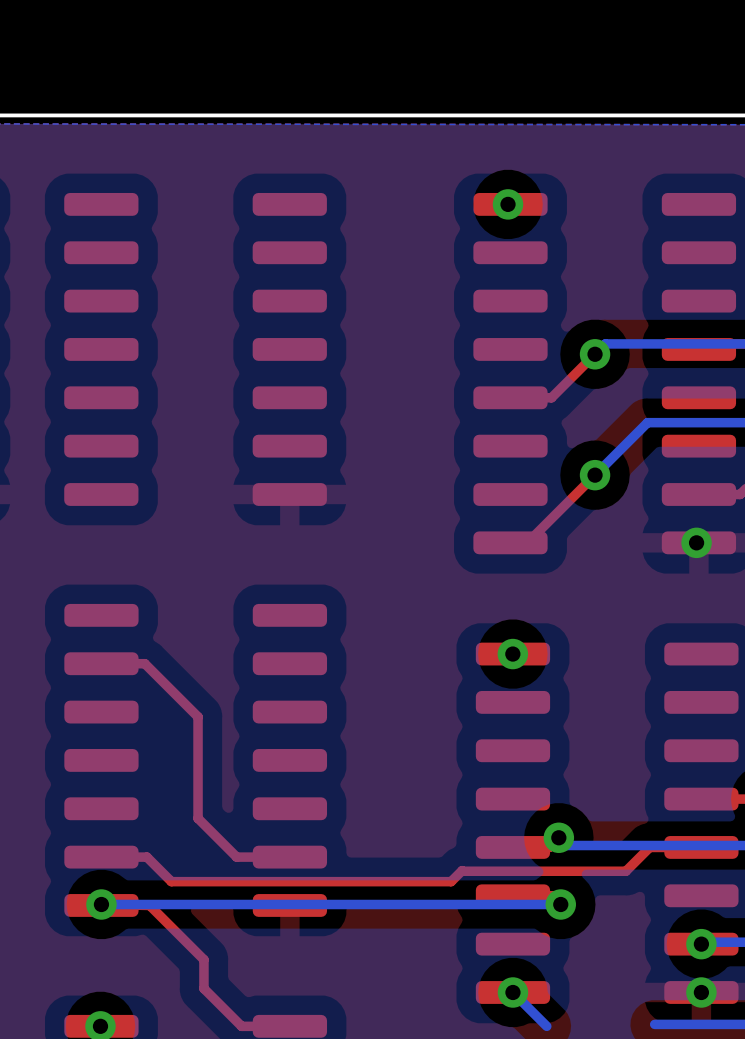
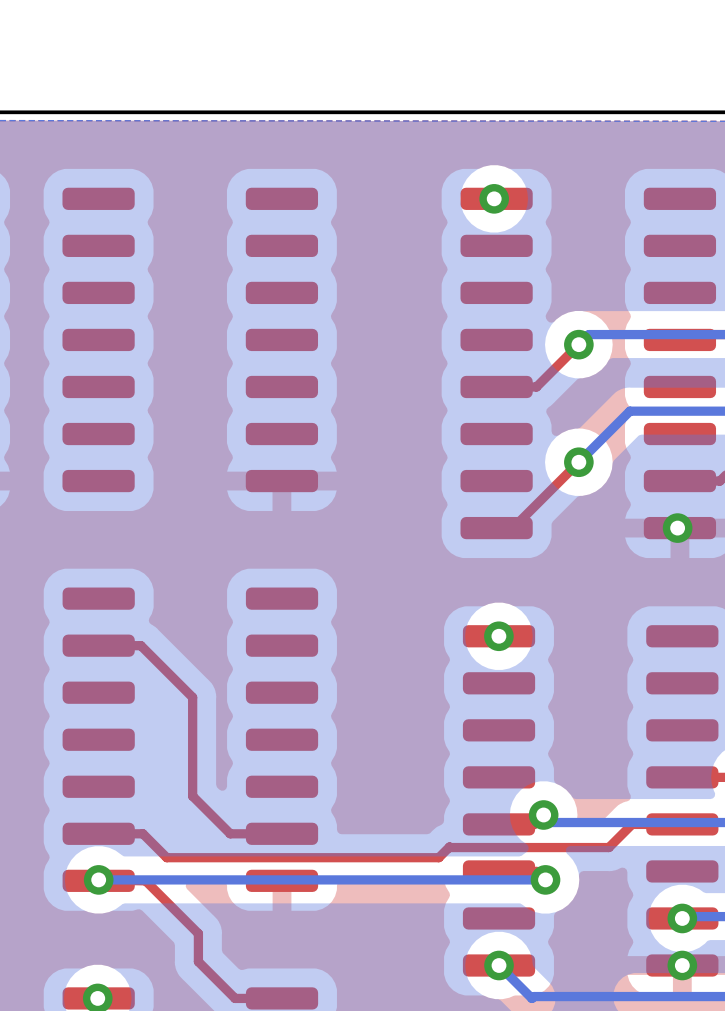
bottom track: none -> (636, 996) (533, 996) (531, 998)

